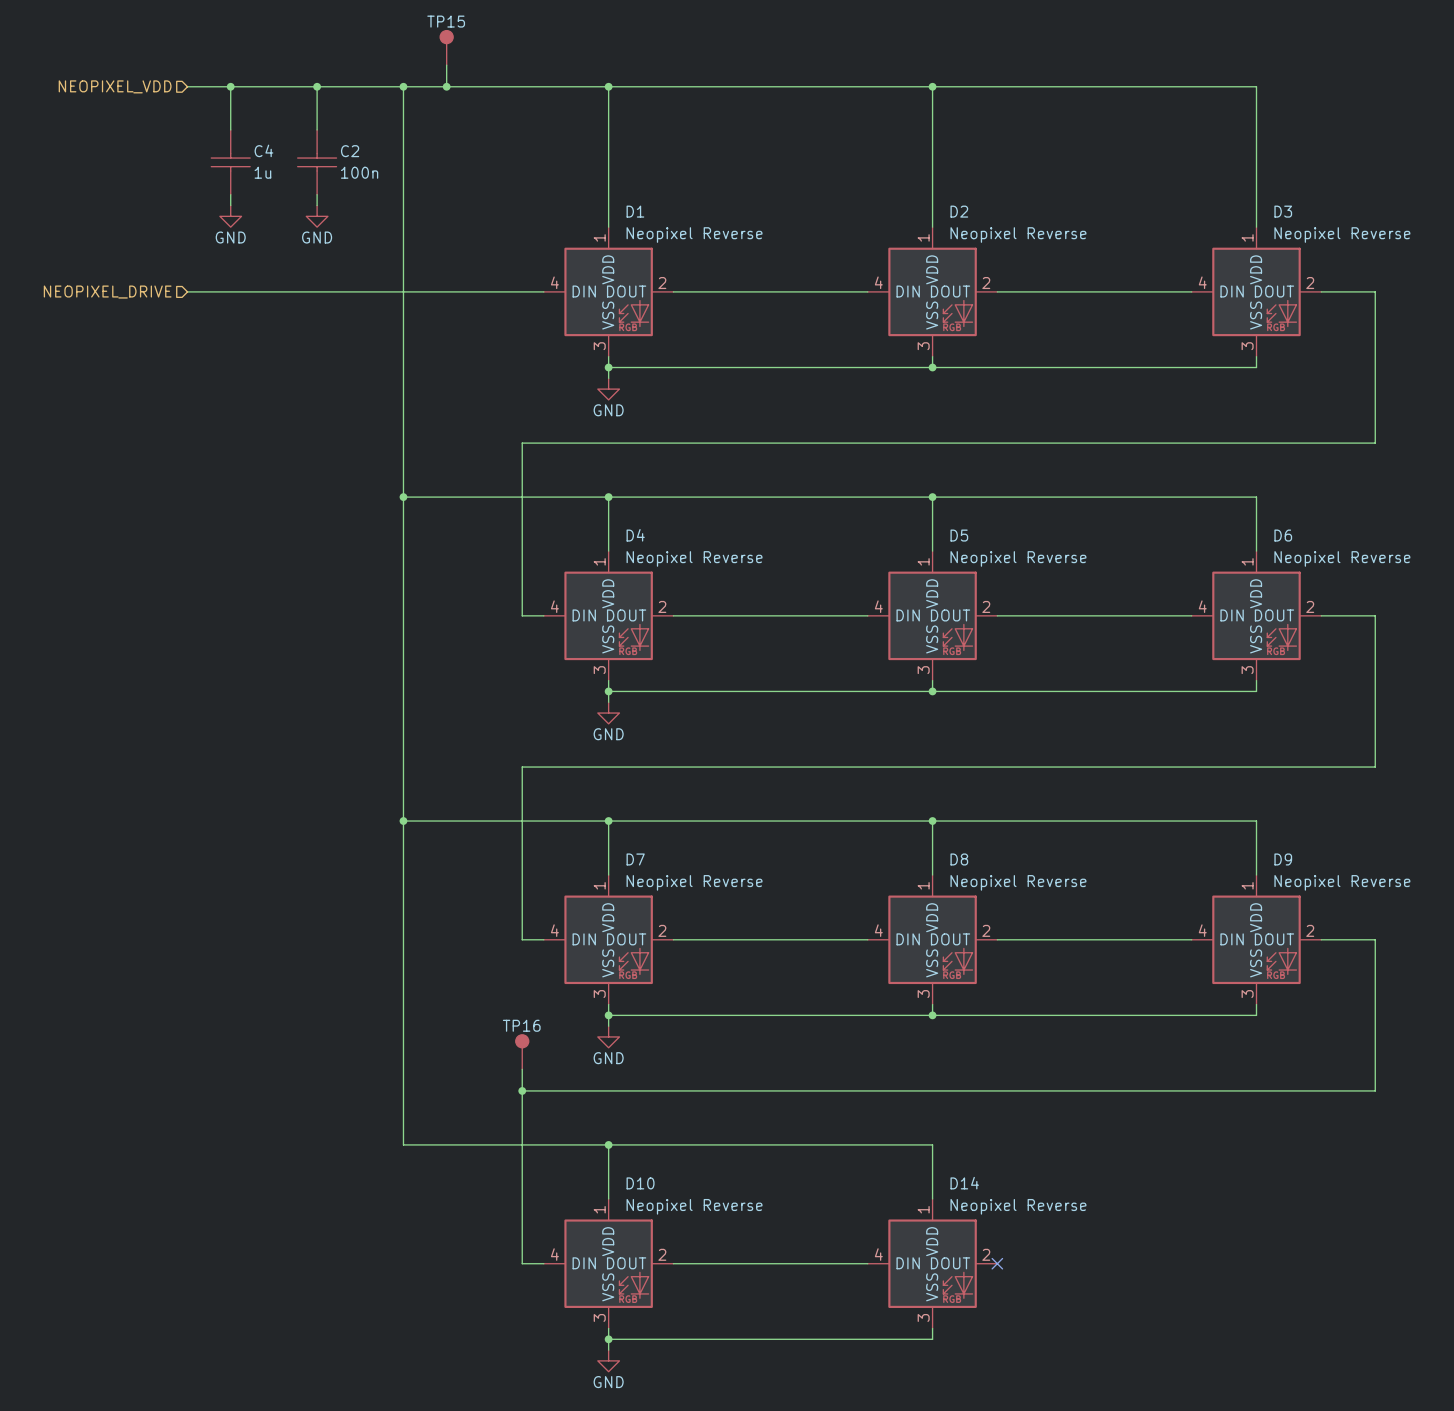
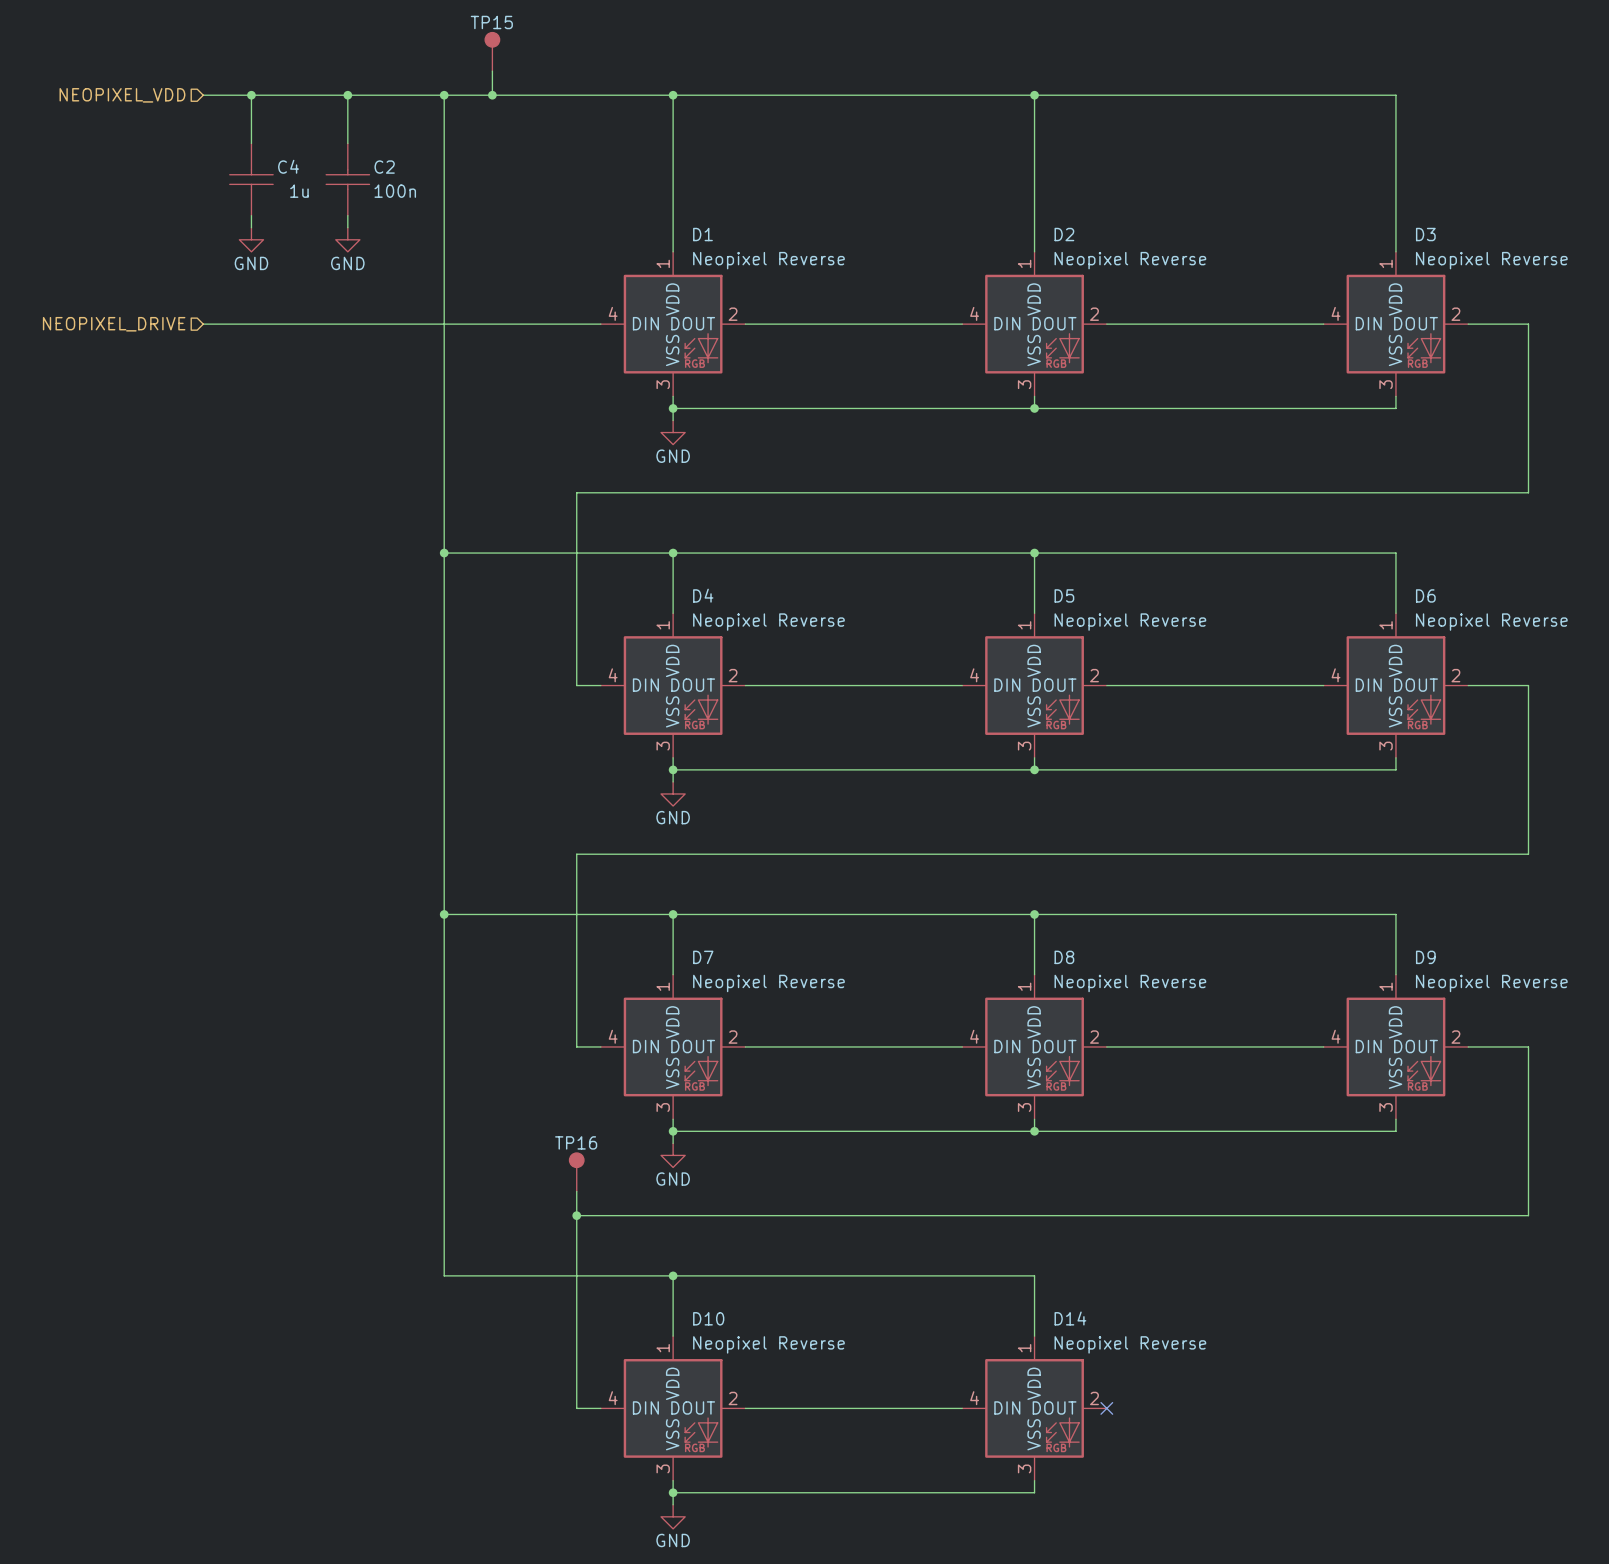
C4 text: 1u (262, 172) -> none
C4 value: none -> 1u (299, 191)

